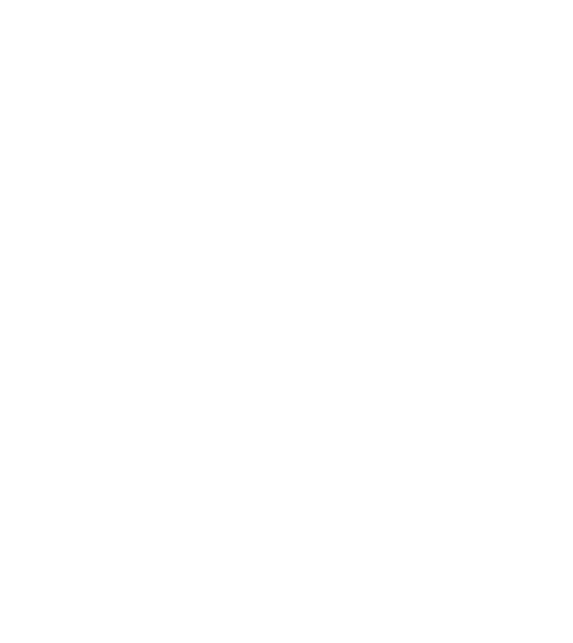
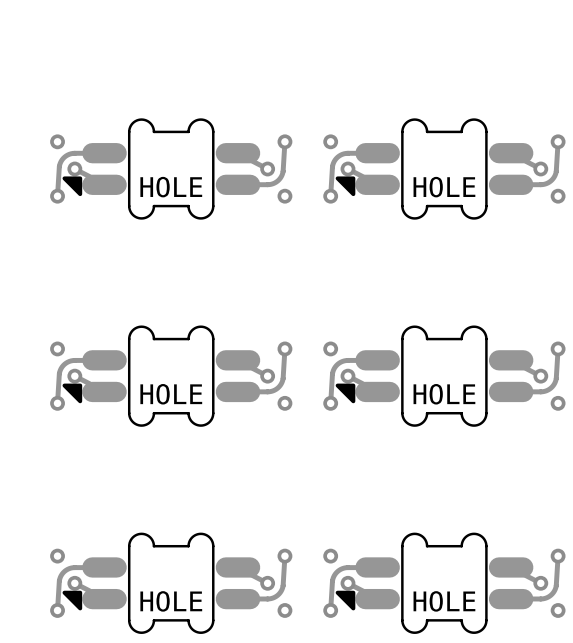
part: none -> (171, 169)
part: none -> (444, 169)
part: none -> (171, 376)
part: none -> (444, 376)
part: none -> (171, 583)
part: none -> (444, 583)

